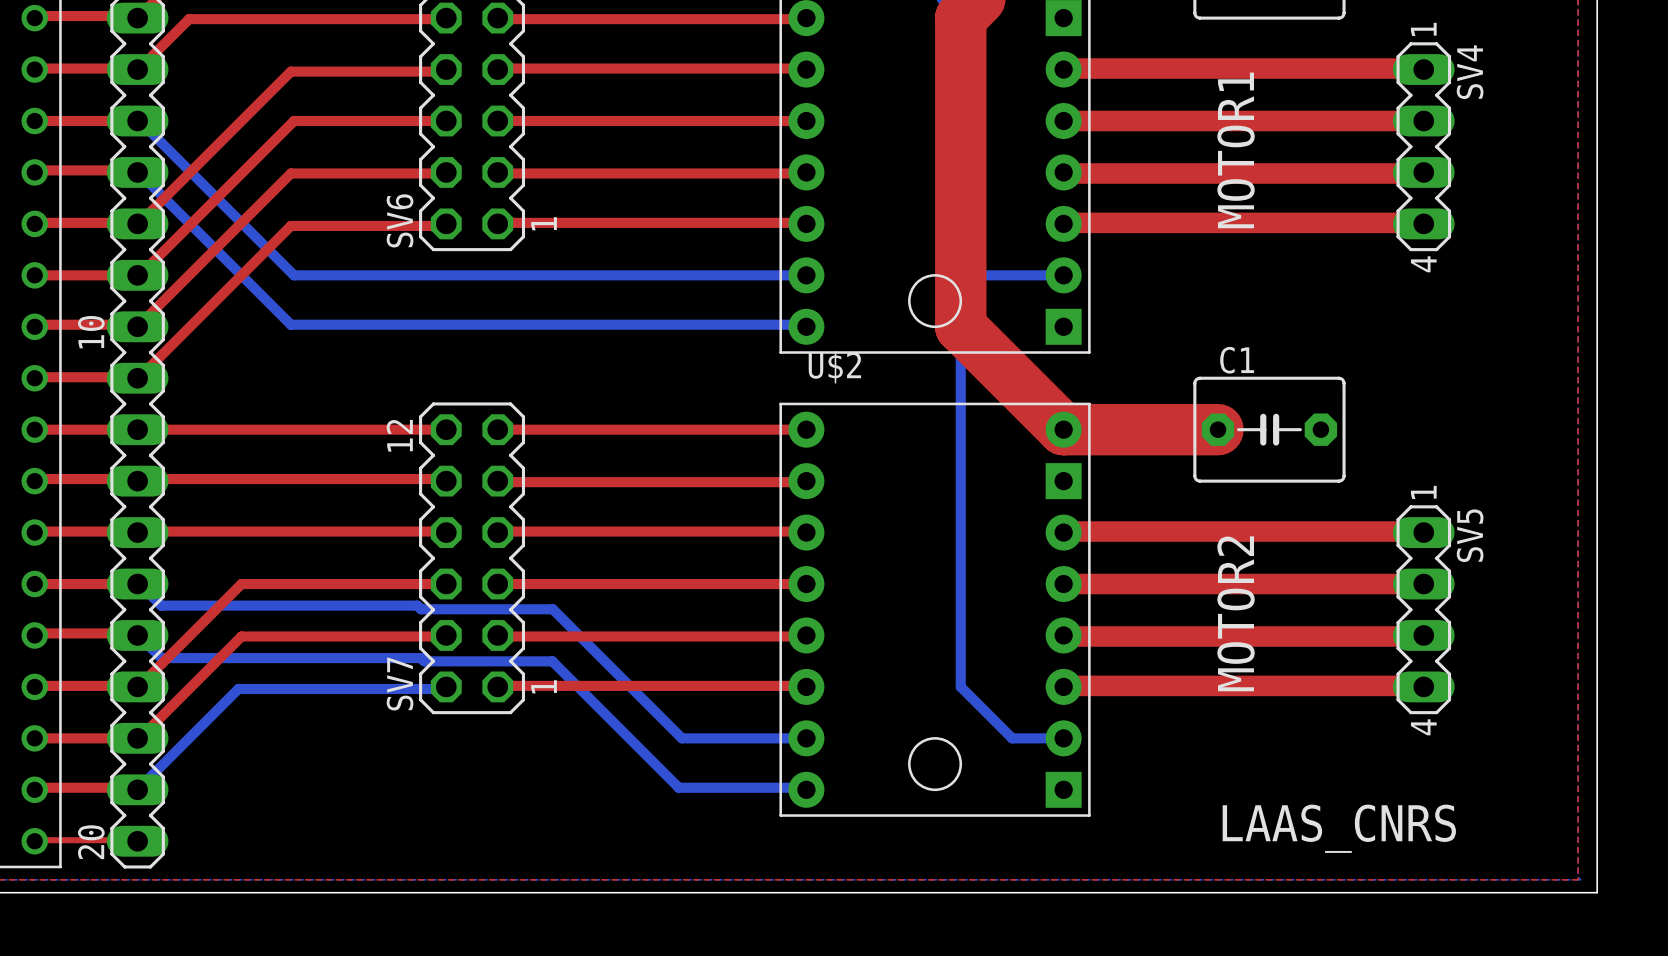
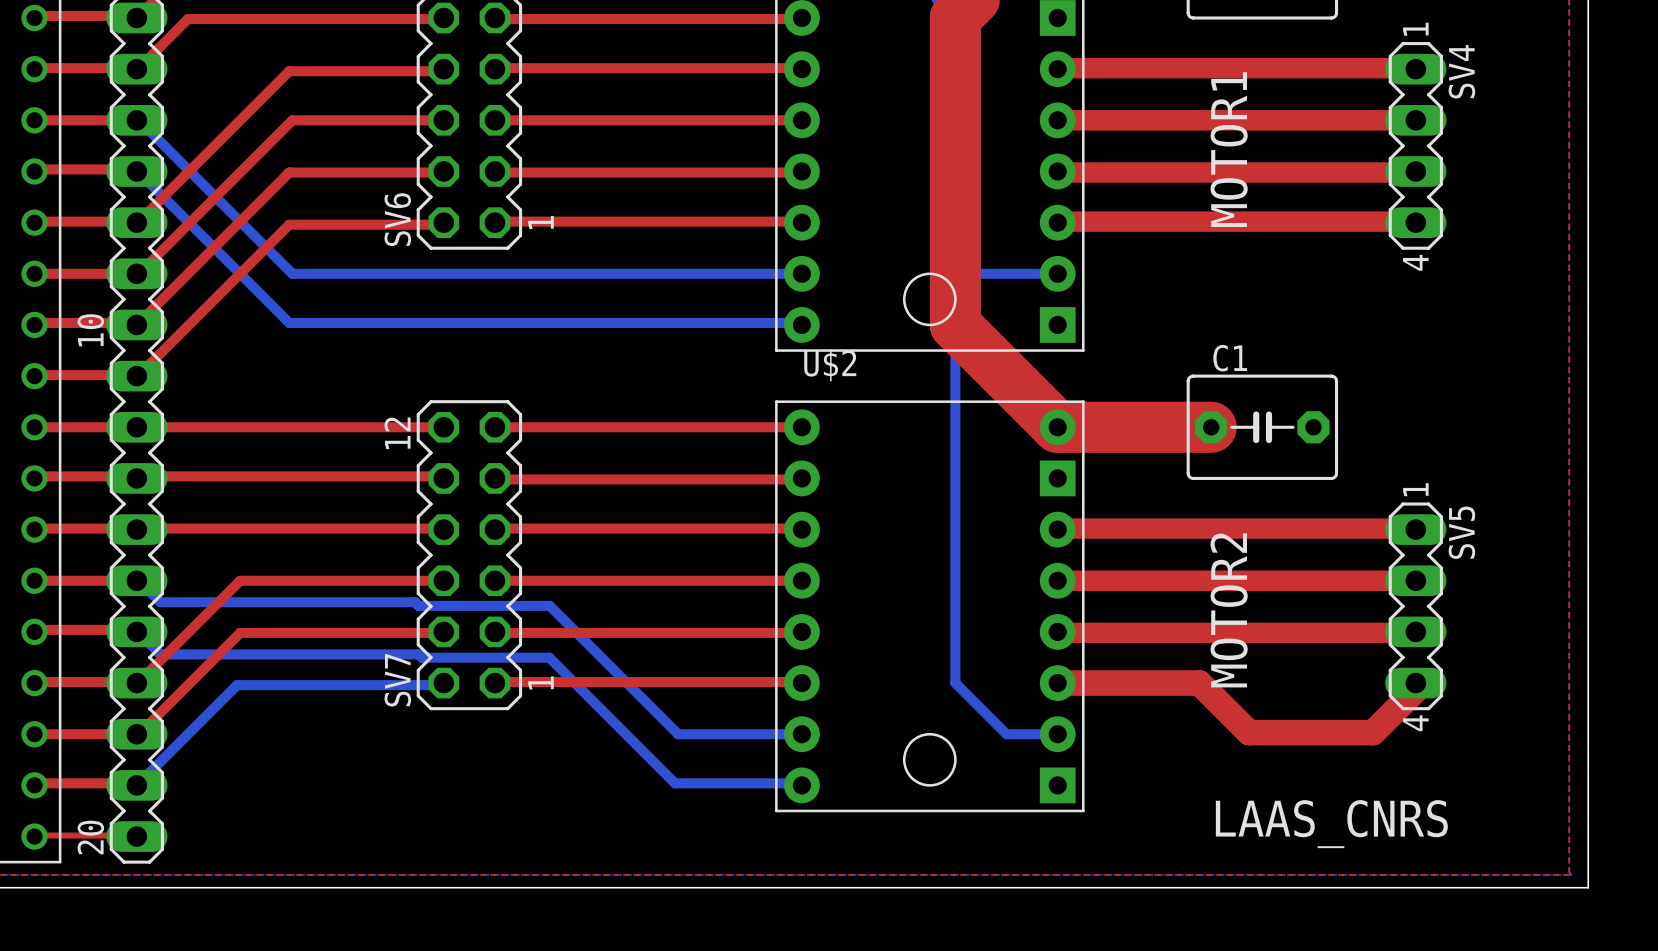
top track: (1065, 685) (1423, 685) -> none
top track: none -> (1057, 683) (1199, 683) (1249, 732) (1373, 732) (1415, 689) (1415, 683)

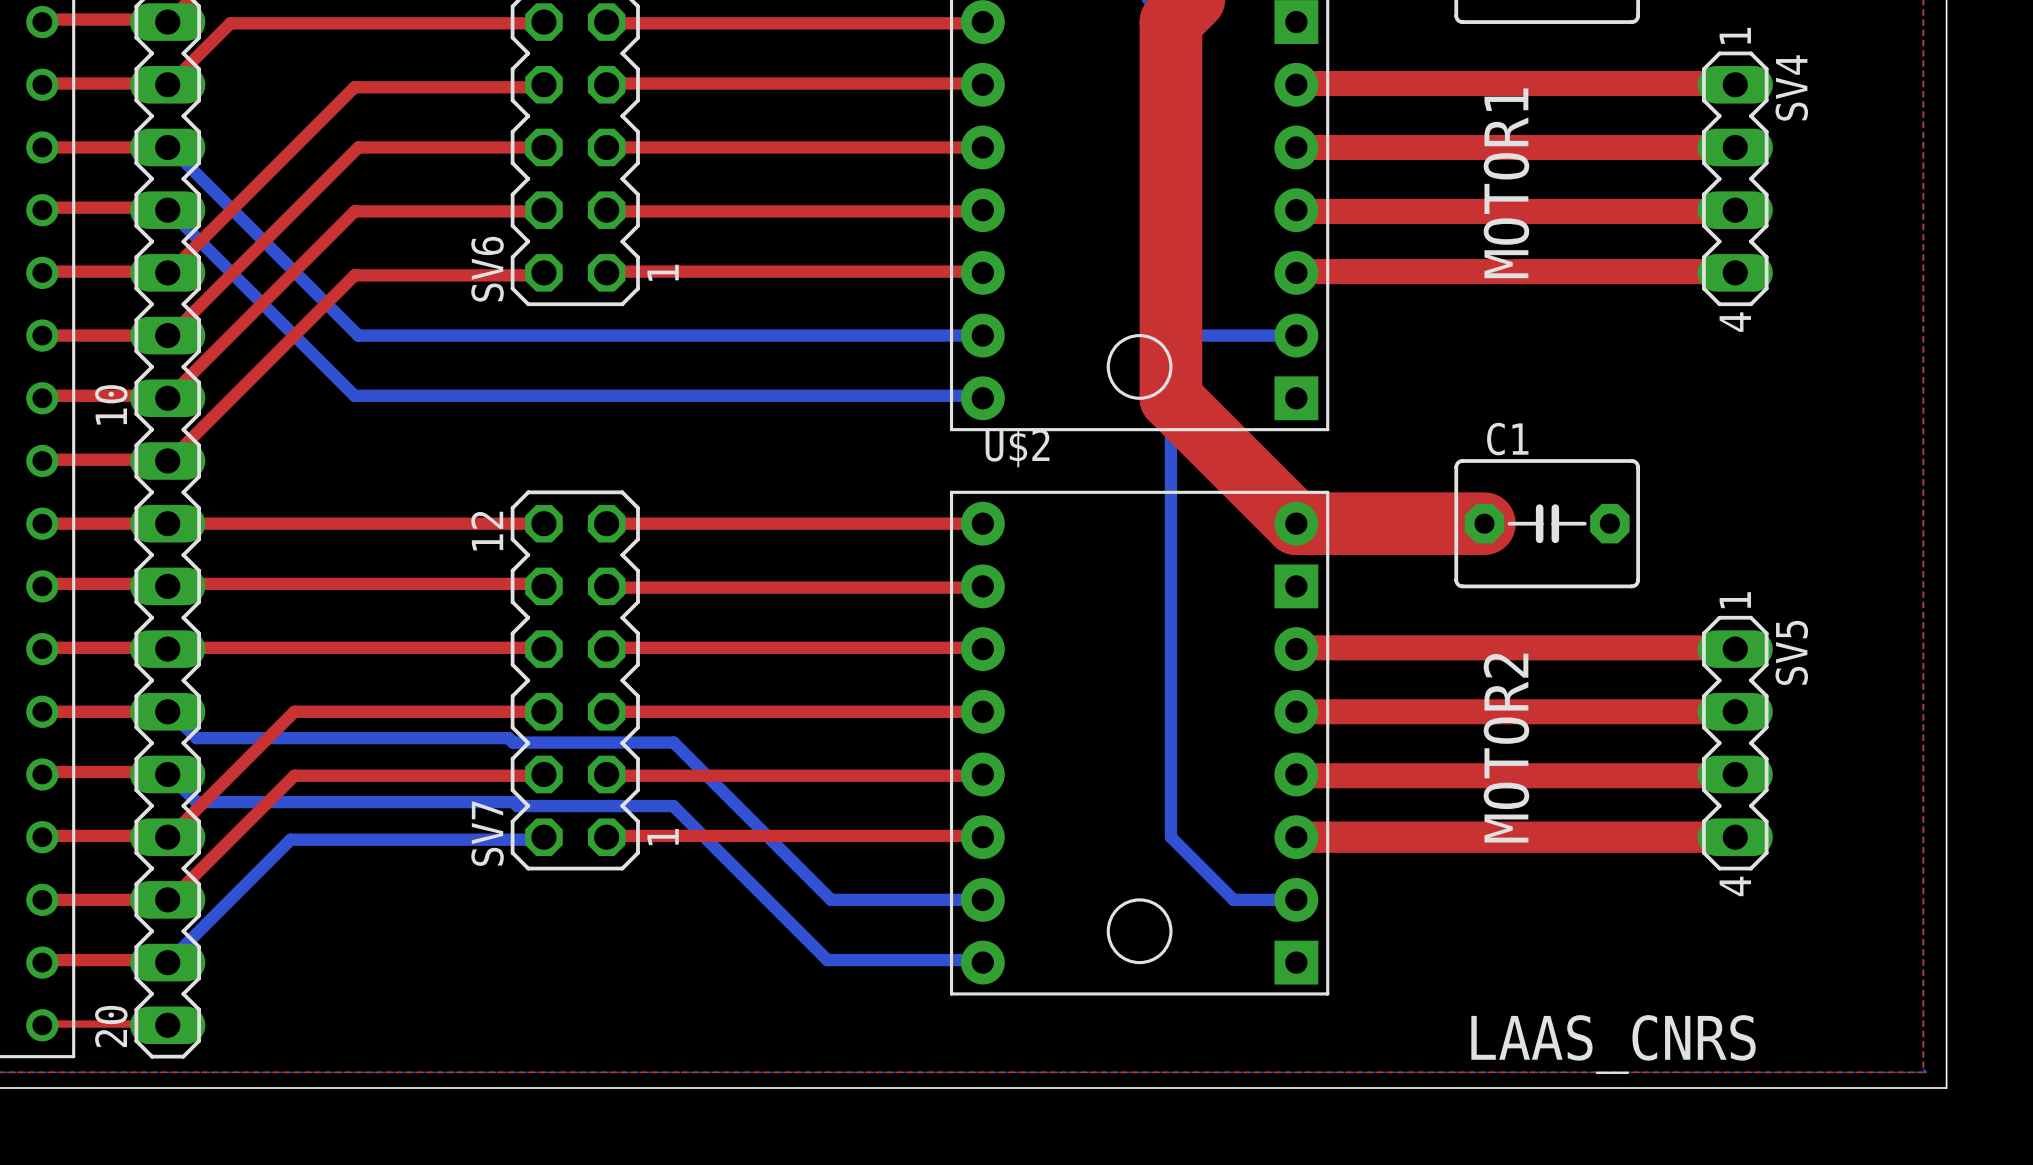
top track: (1199, 683) (1249, 732) (1373, 732) (1415, 689) (1415, 683) -> (1470, 837) (1735, 837)
text position: LAAS_CNRS (1331, 824) -> LAAS_CNRS (1613, 1044)

